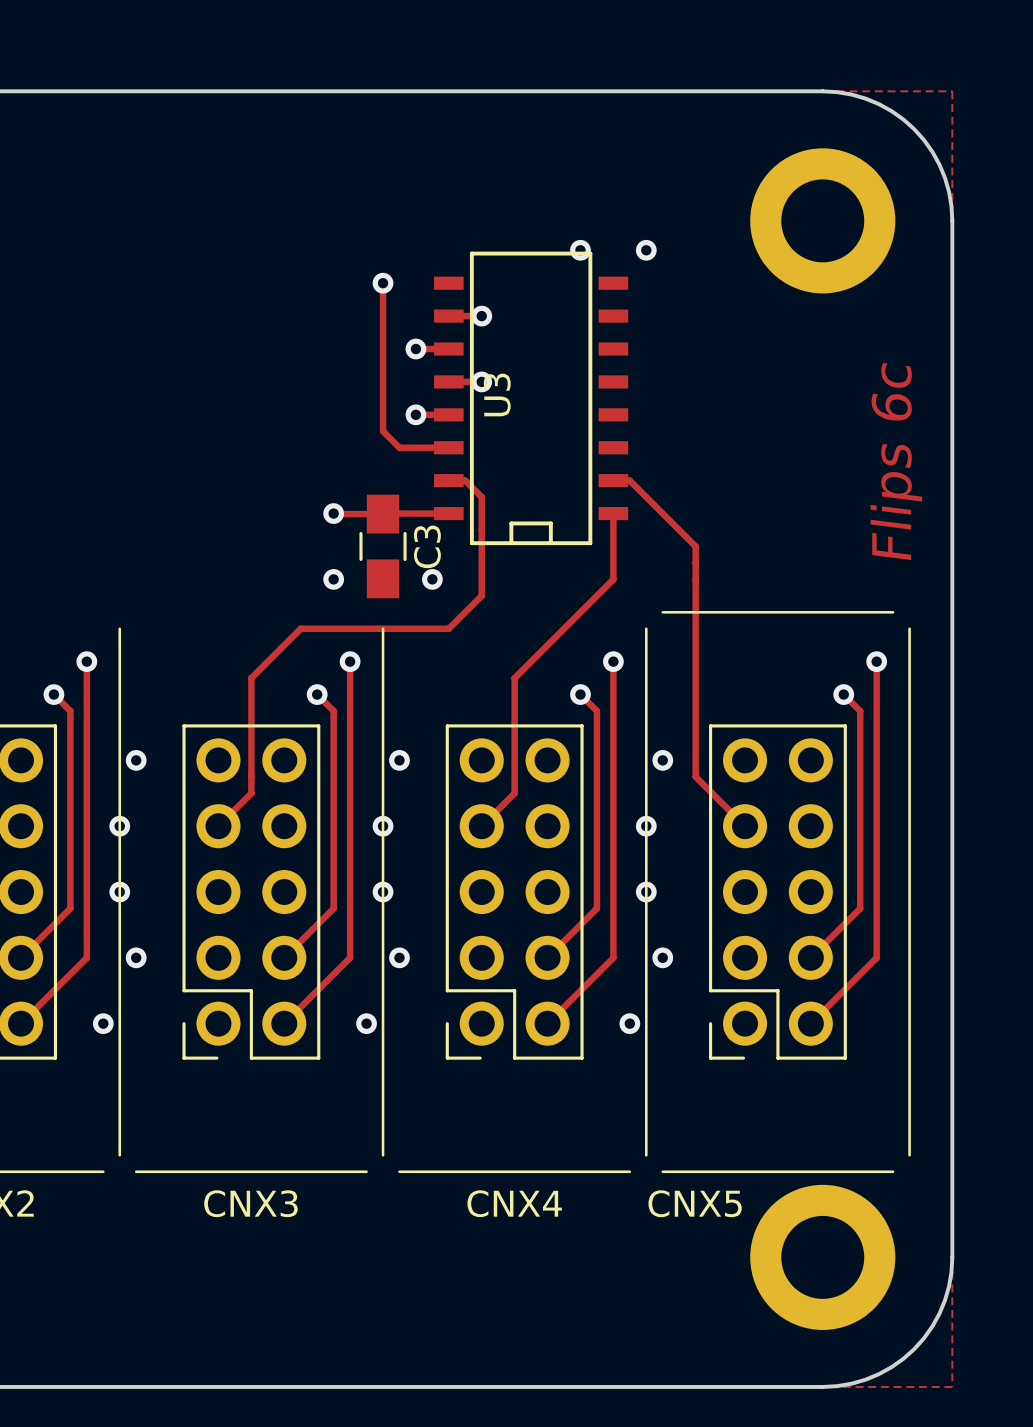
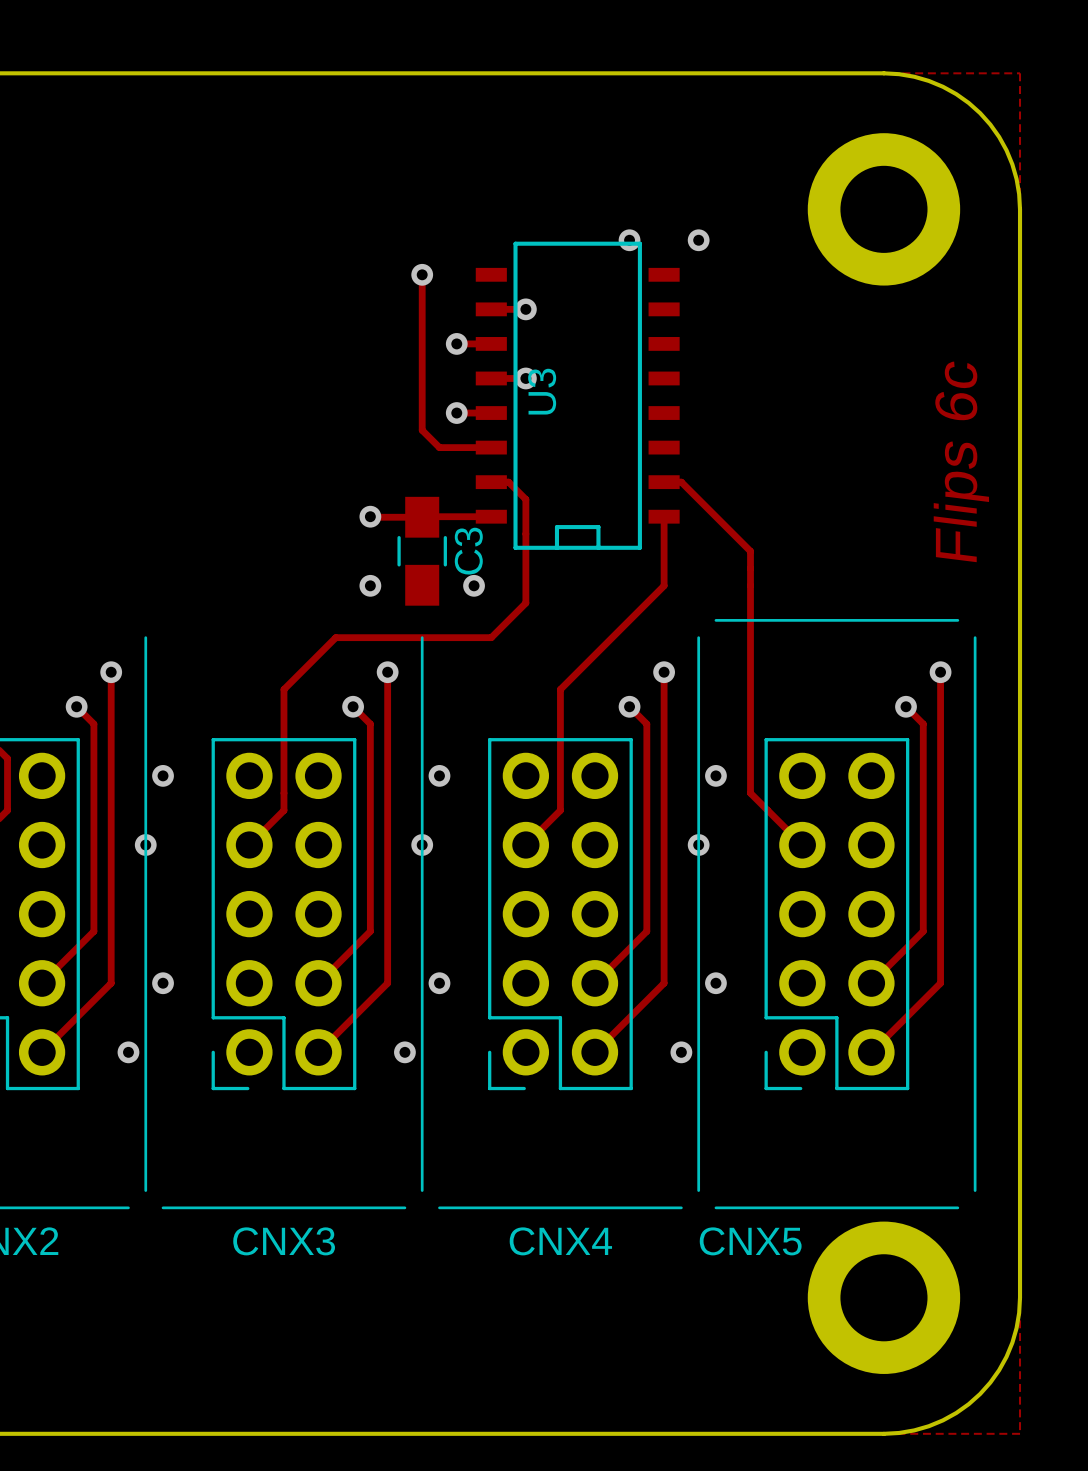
via: (119, 892) -> none
via: (383, 892) -> none
via: (646, 892) -> none

